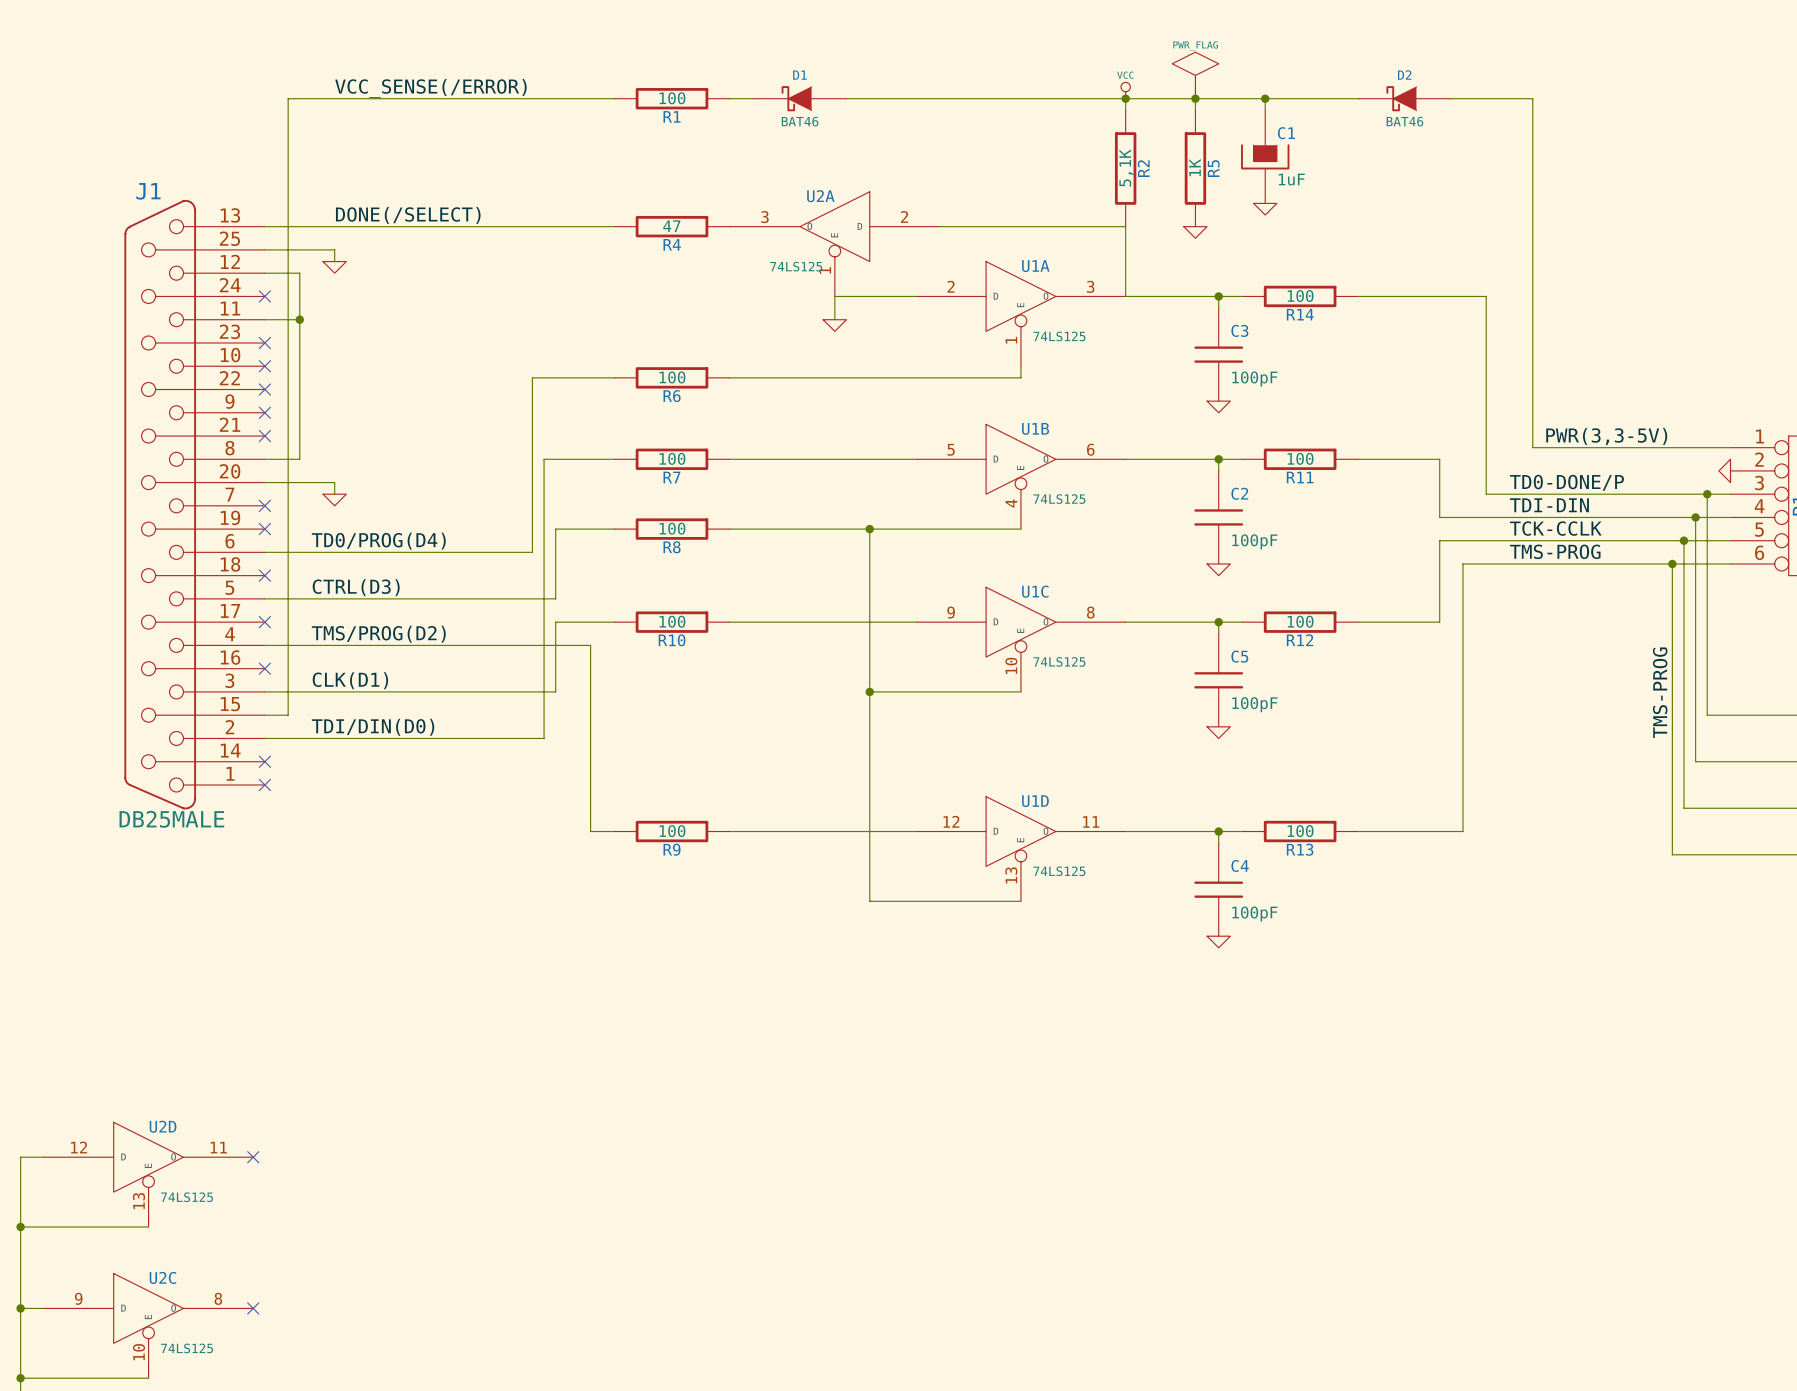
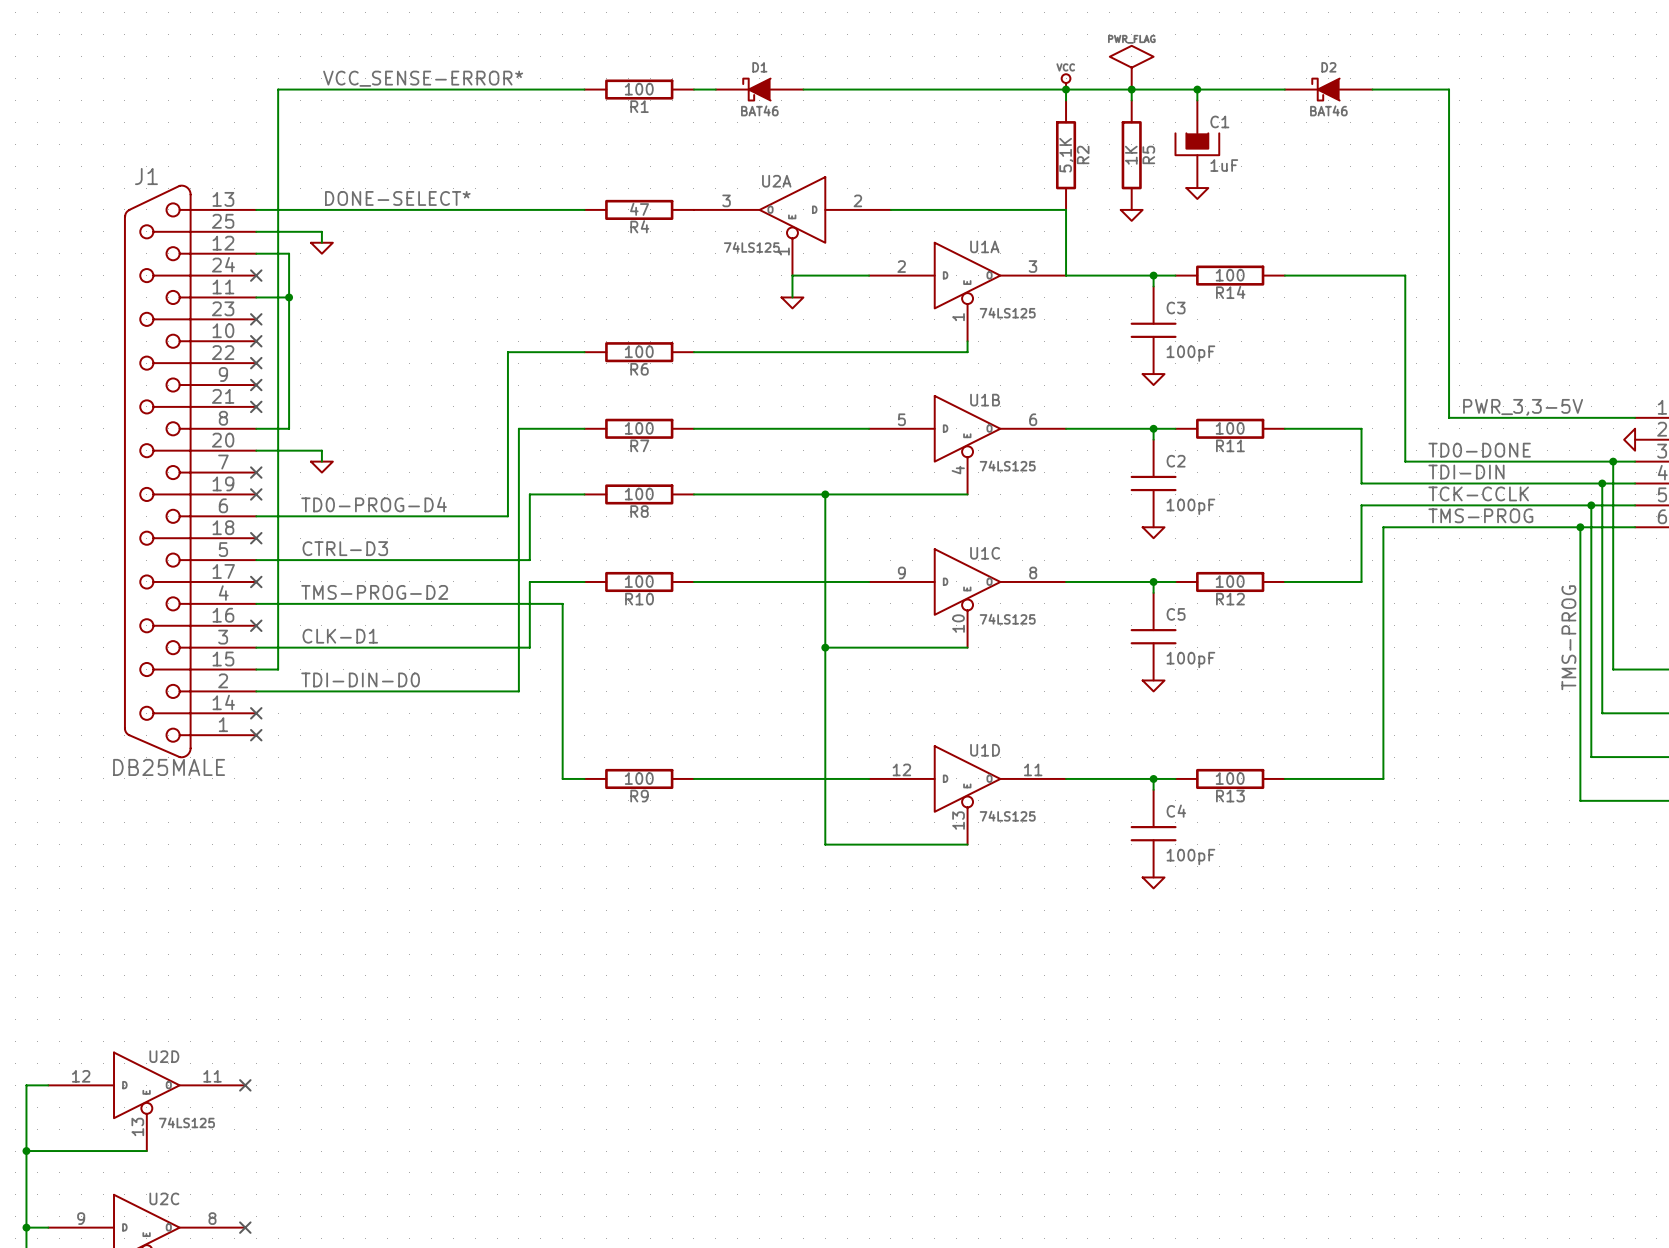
label: VCC_SENSE(/ERROR) (430, 88) -> VCC_SENSE-ERROR* (423, 78)
label: DONE(/SELECT) (408, 215) -> DONE-SELECT* (397, 198)
label: PWR(3,3-5V) (1606, 436) -> PWR_3,3-5V (1523, 407)
label: TD0-DONE/P (1566, 482) -> TD0-DONE (1479, 450)
label: TD0/PROG(D4) (378, 541) -> TD0-PROG-D4 (374, 504)
label: CTRL(D3) (356, 587) -> CTRL-D3 (345, 548)
label: TMS/PROG(D2) (378, 634) -> TMS-PROG-D2 (374, 592)
label: CLK(D1) (350, 680) -> CLK-D1 (340, 636)
label: TDI/DIN(D0) (373, 727) -> TDI-DIN-D0 (360, 679)

